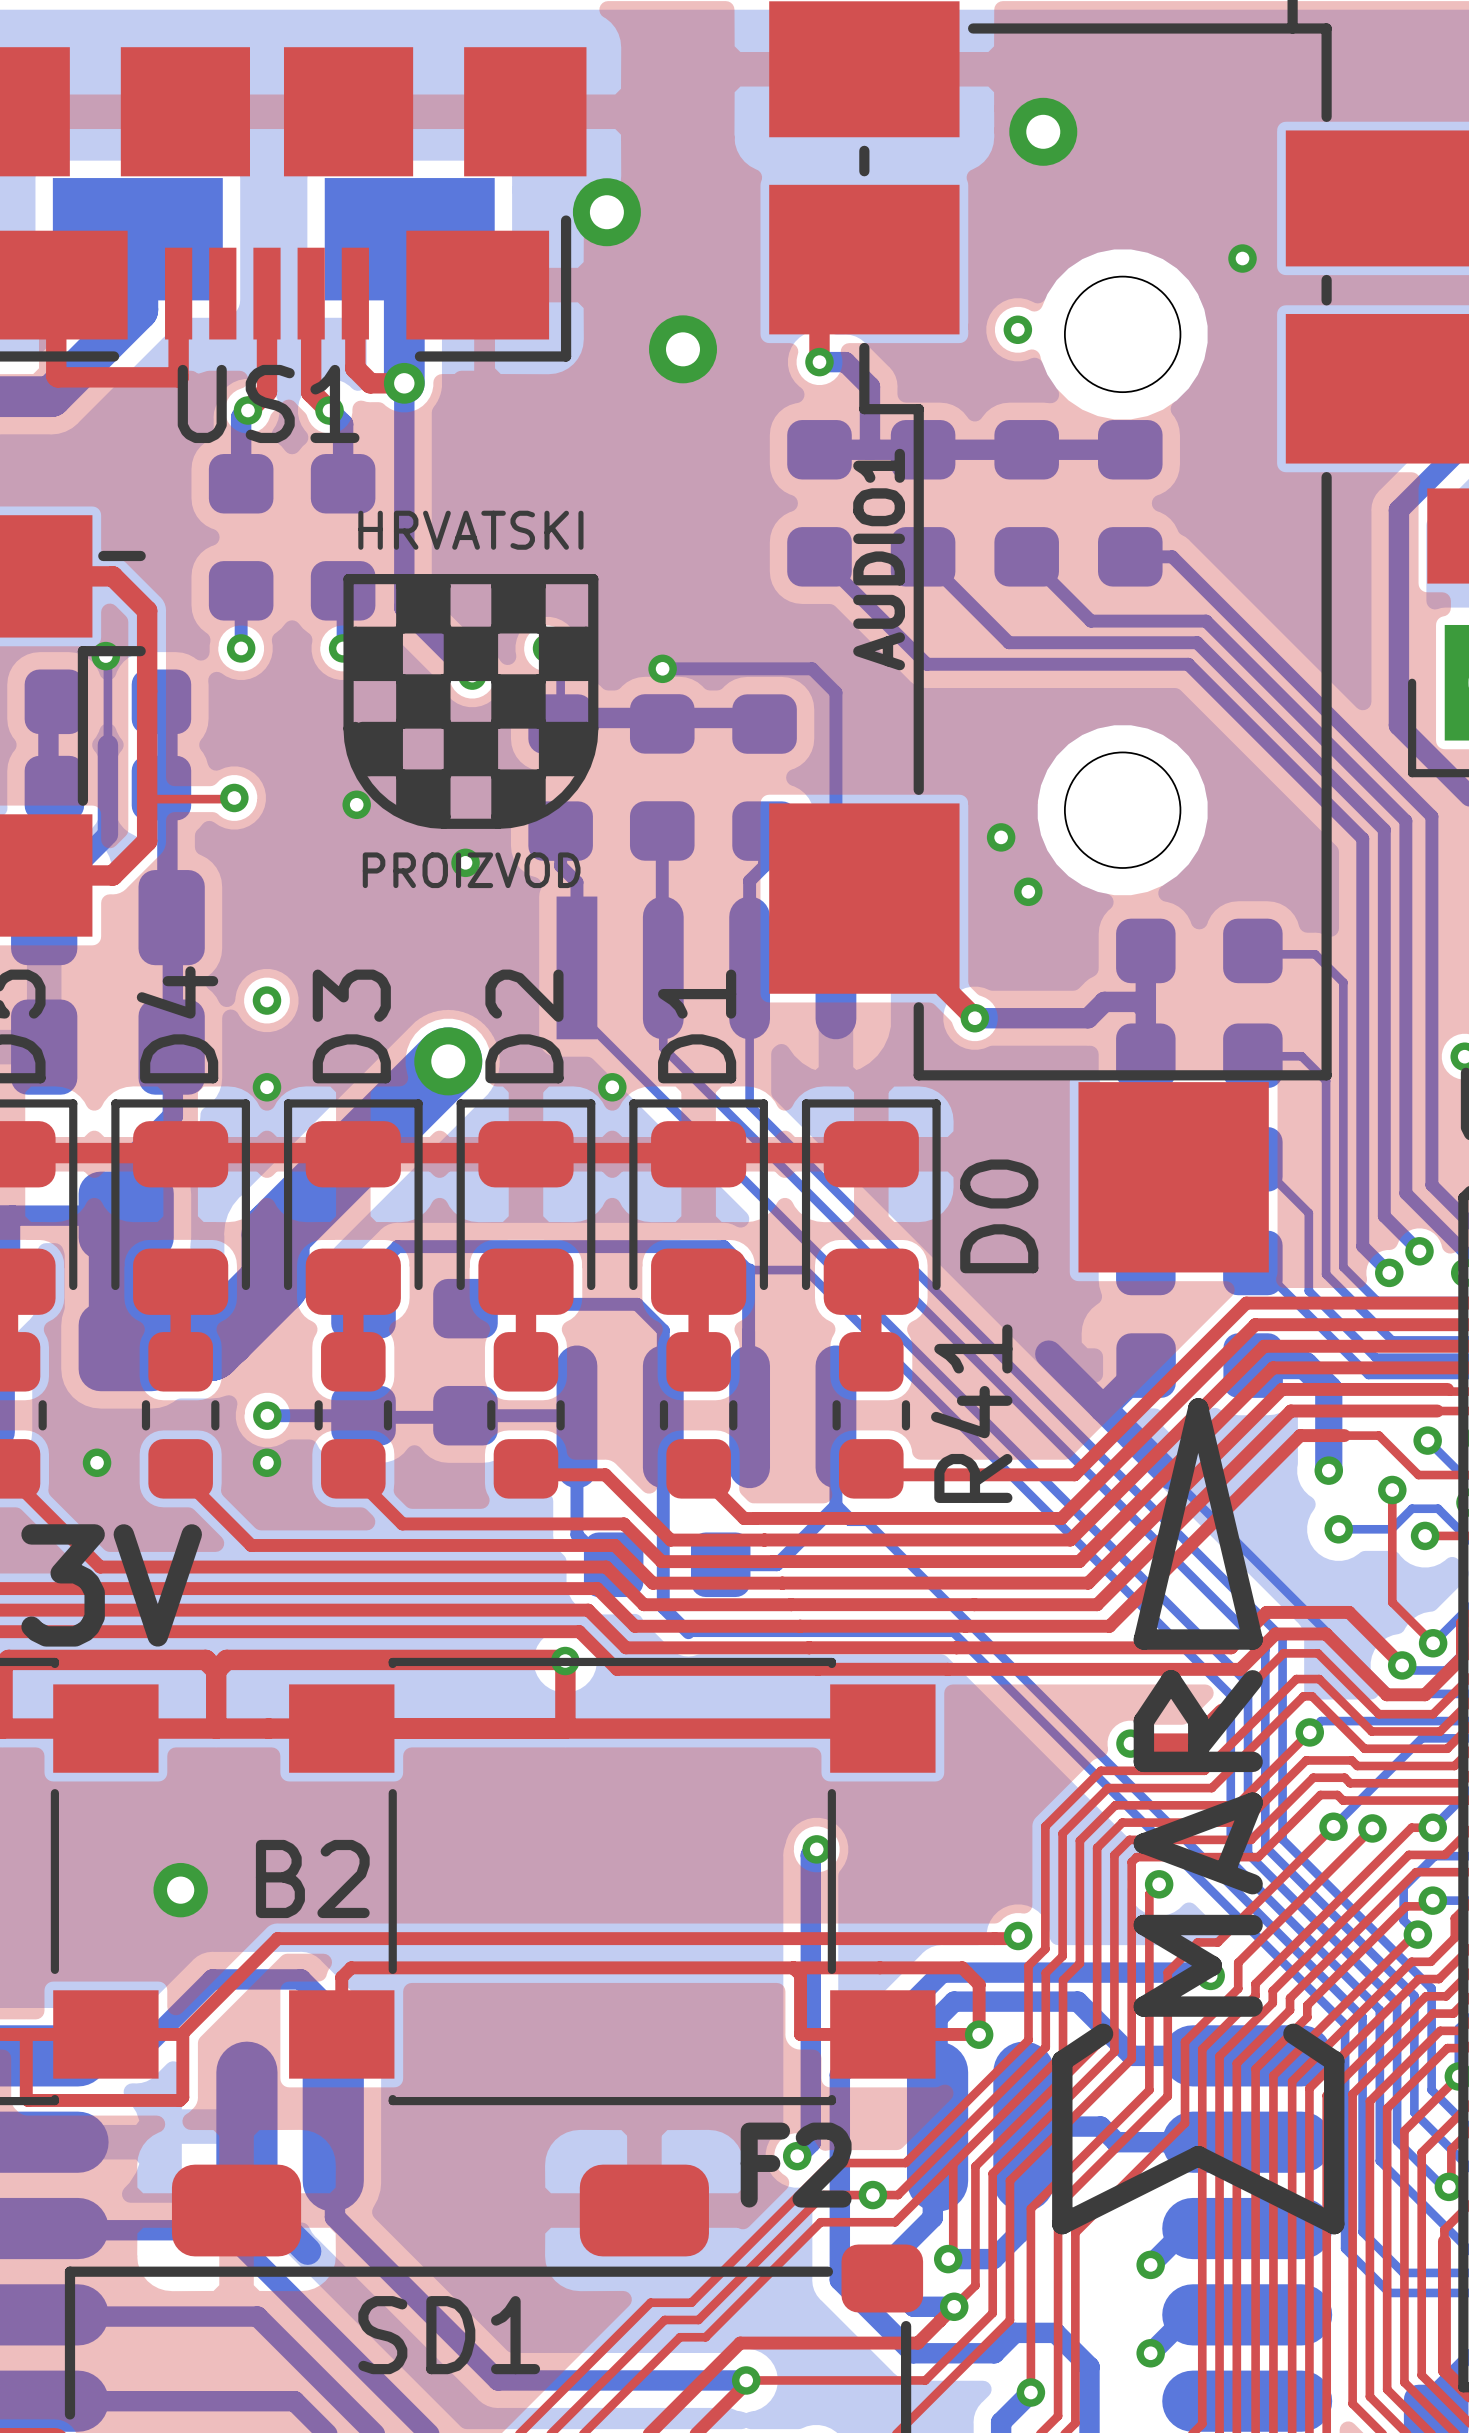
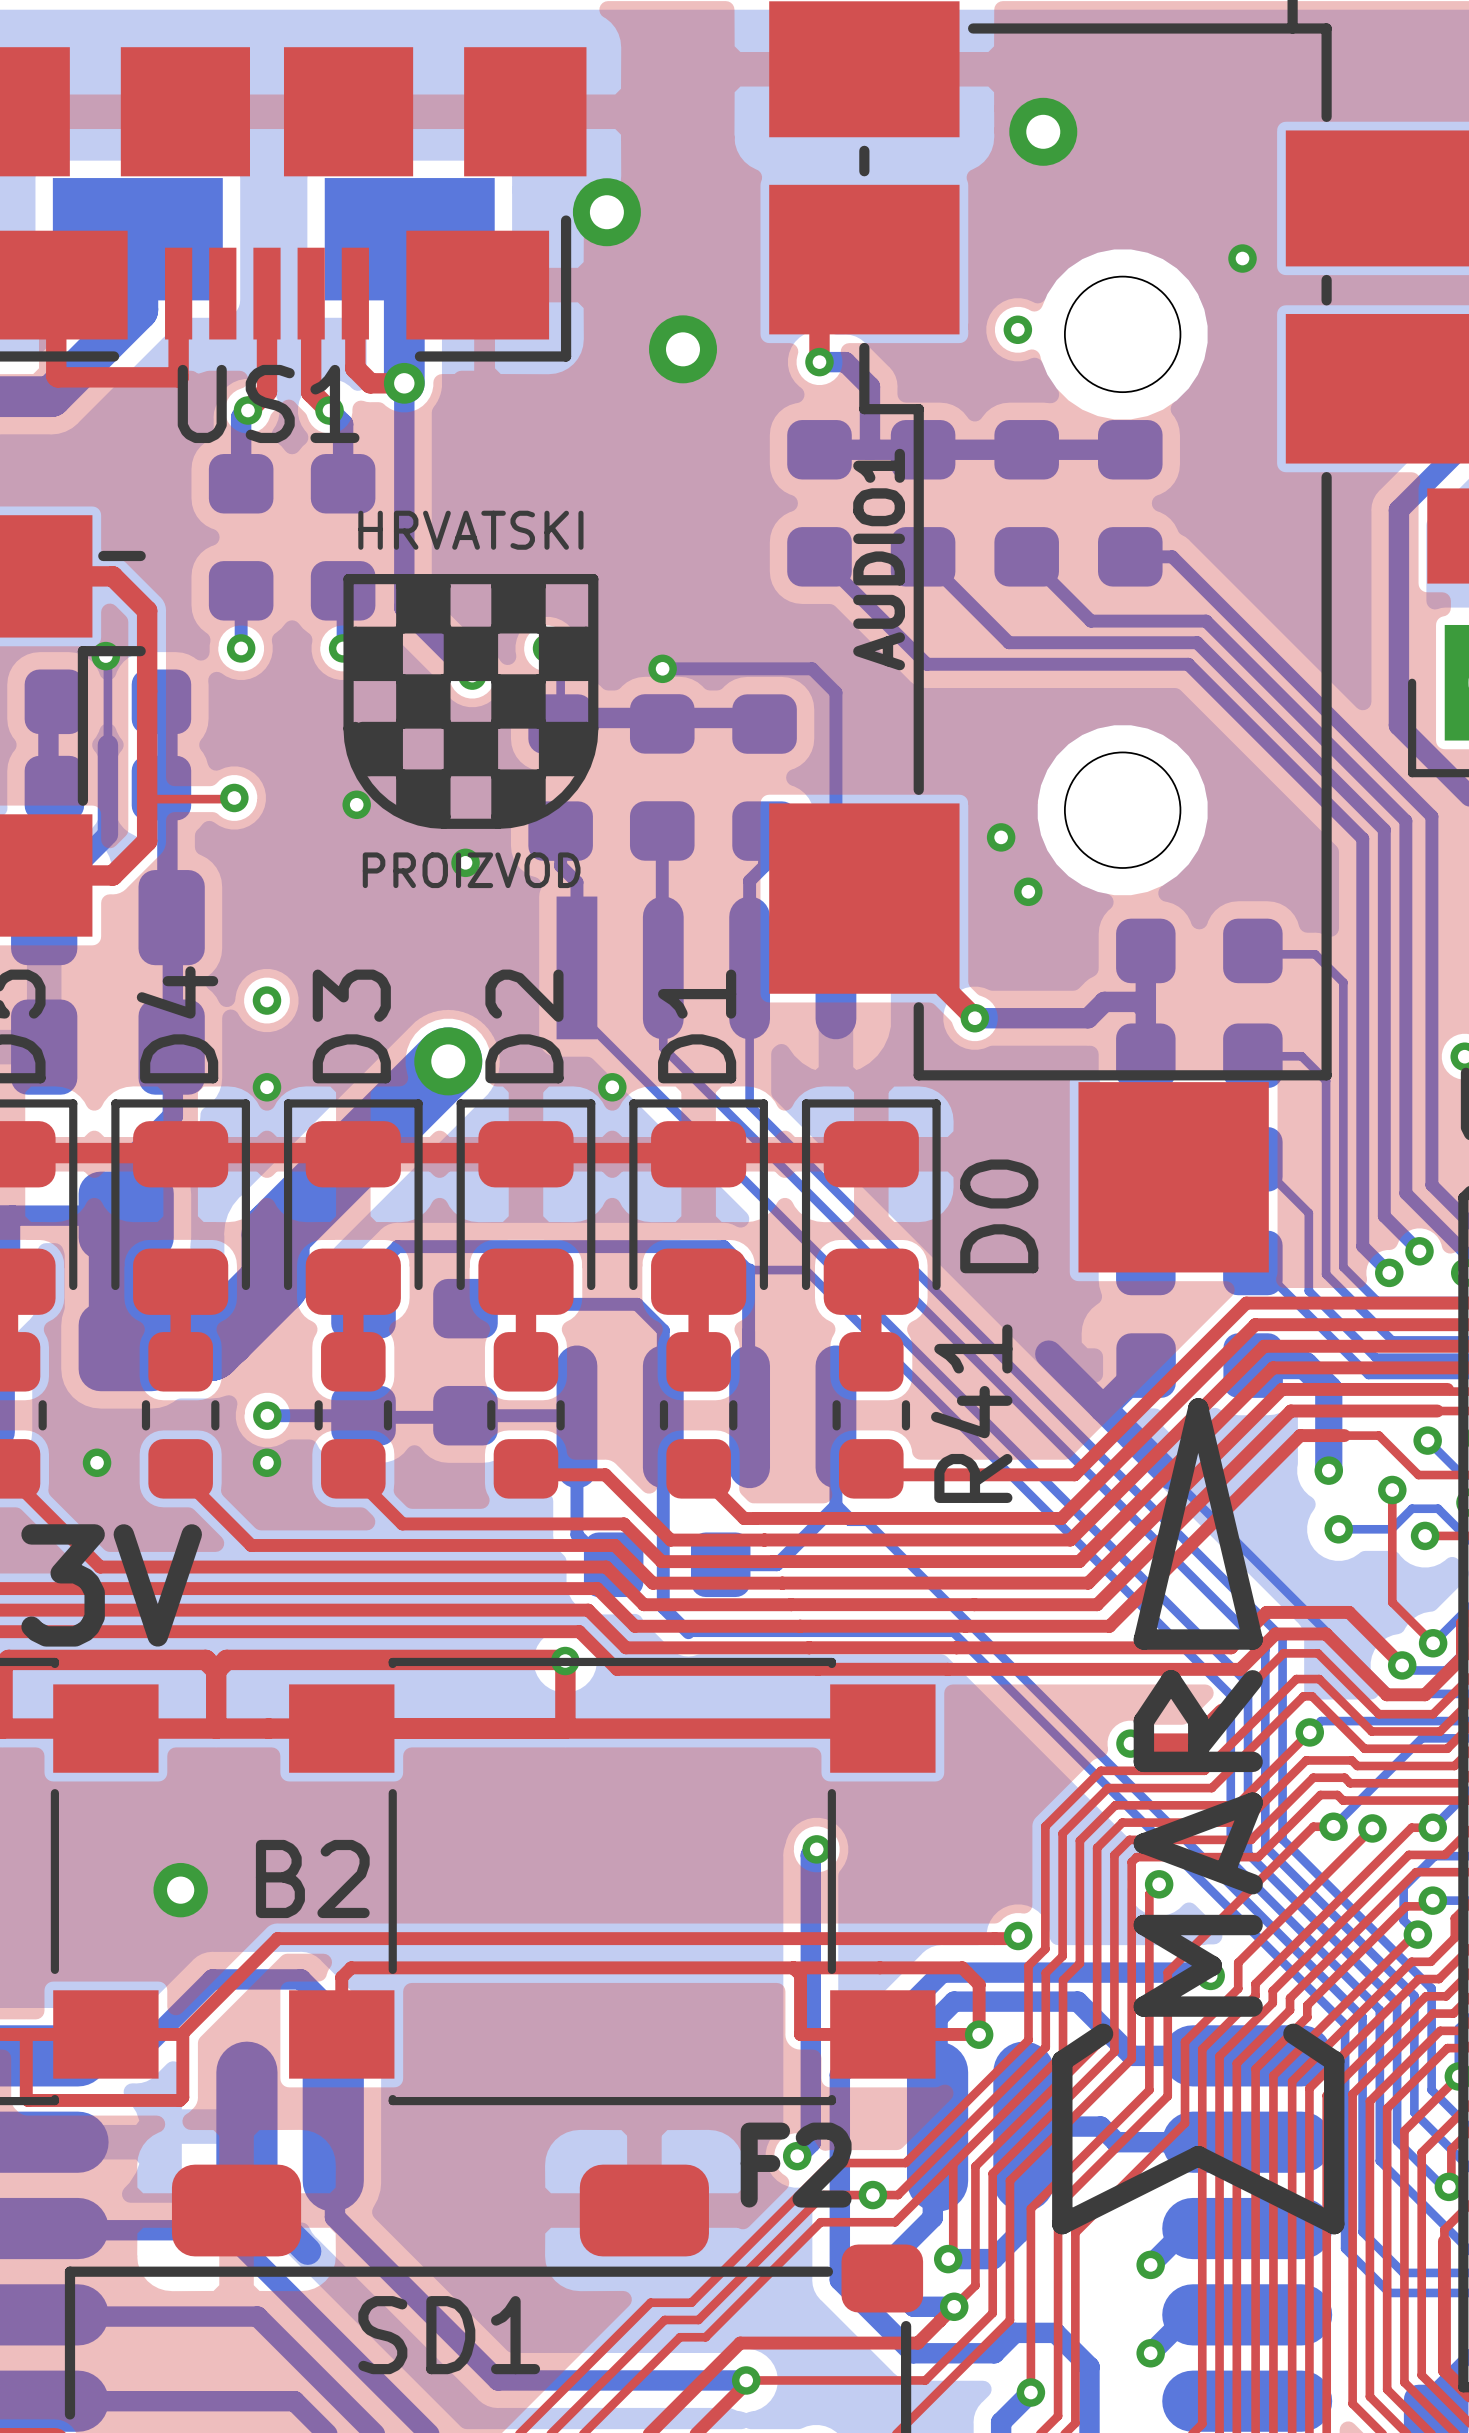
top track: (1333, 1826) (1217, 1942) (1197, 1942) -> (1333, 1826) (1313, 1826) (1197, 1942)

